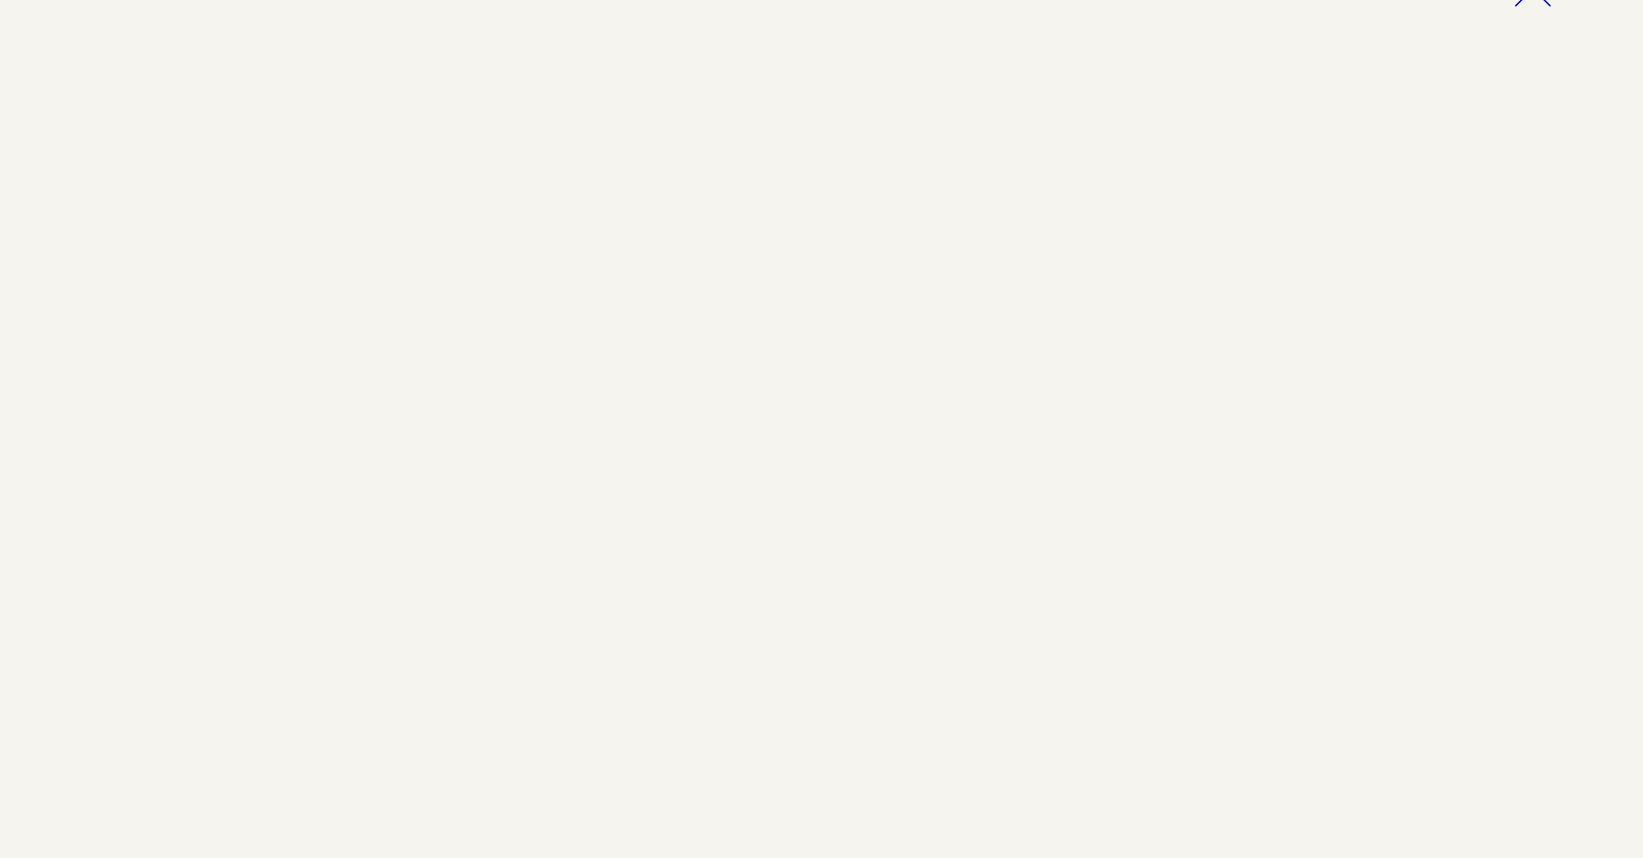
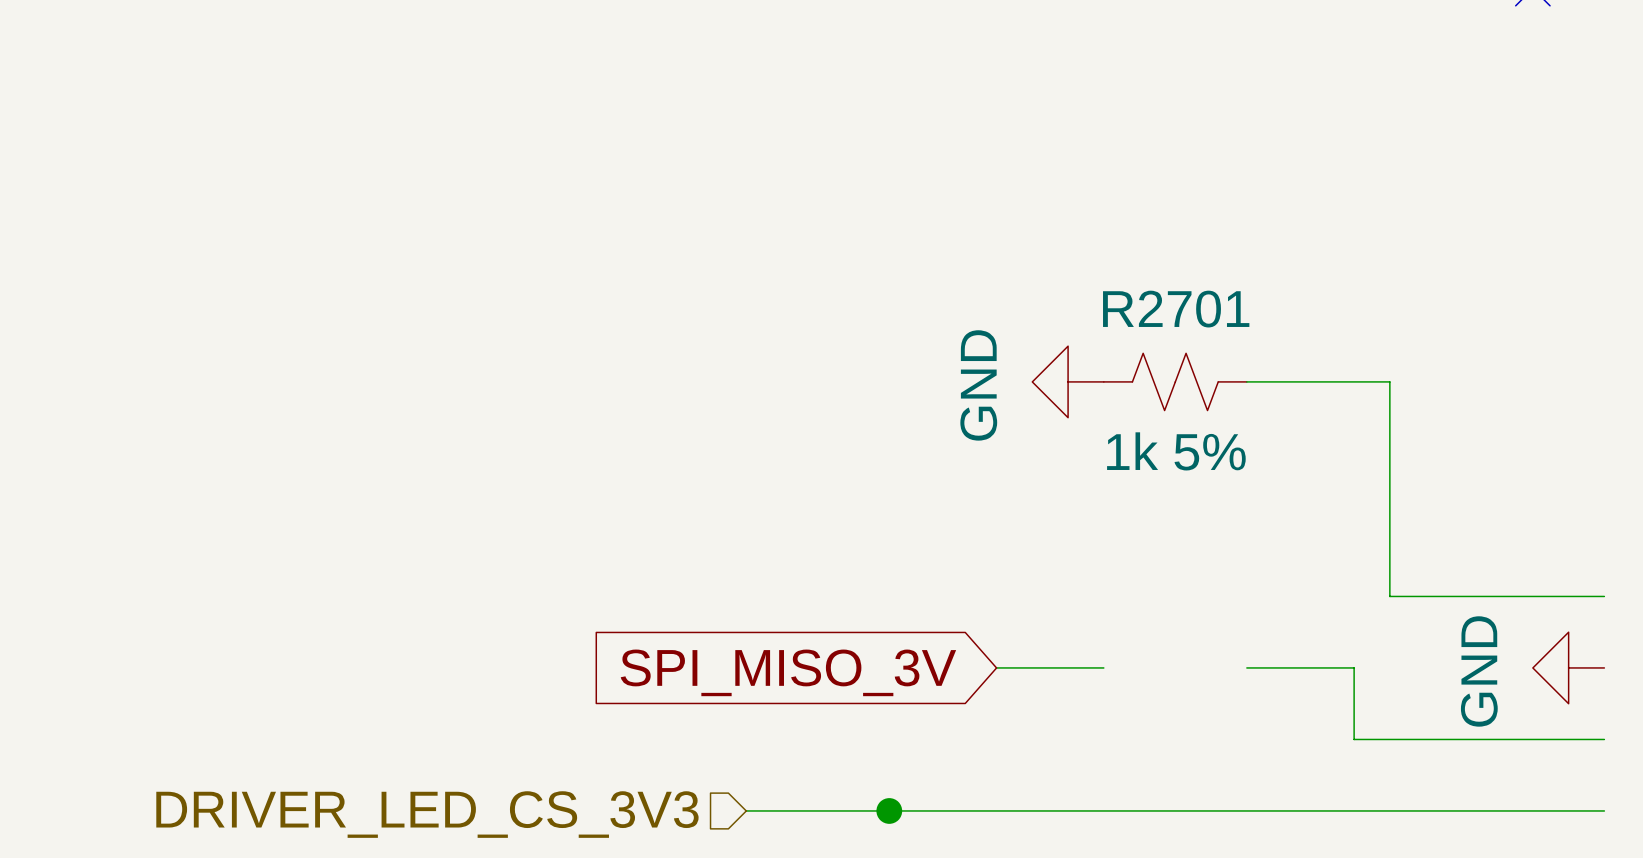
power symbol: none -> GND (1068, 381)
R2701: none -> 1k 5% (1175, 381)
wire: none -> (1246, 381) (1389, 381) (1389, 596) (1604, 596)
wire: none -> (996, 667) (1103, 667)
wire: none -> (1246, 667) (1354, 667) (1354, 739) (1604, 739)
power symbol: none -> GND (1568, 667)
global label: none -> SPI_MISO_3V (788, 672)
wire: none -> (746, 810) (1604, 810)
junction: none -> (889, 810)
hierarchical label: none -> DRIVER_LED_CS_3V3 (427, 814)

